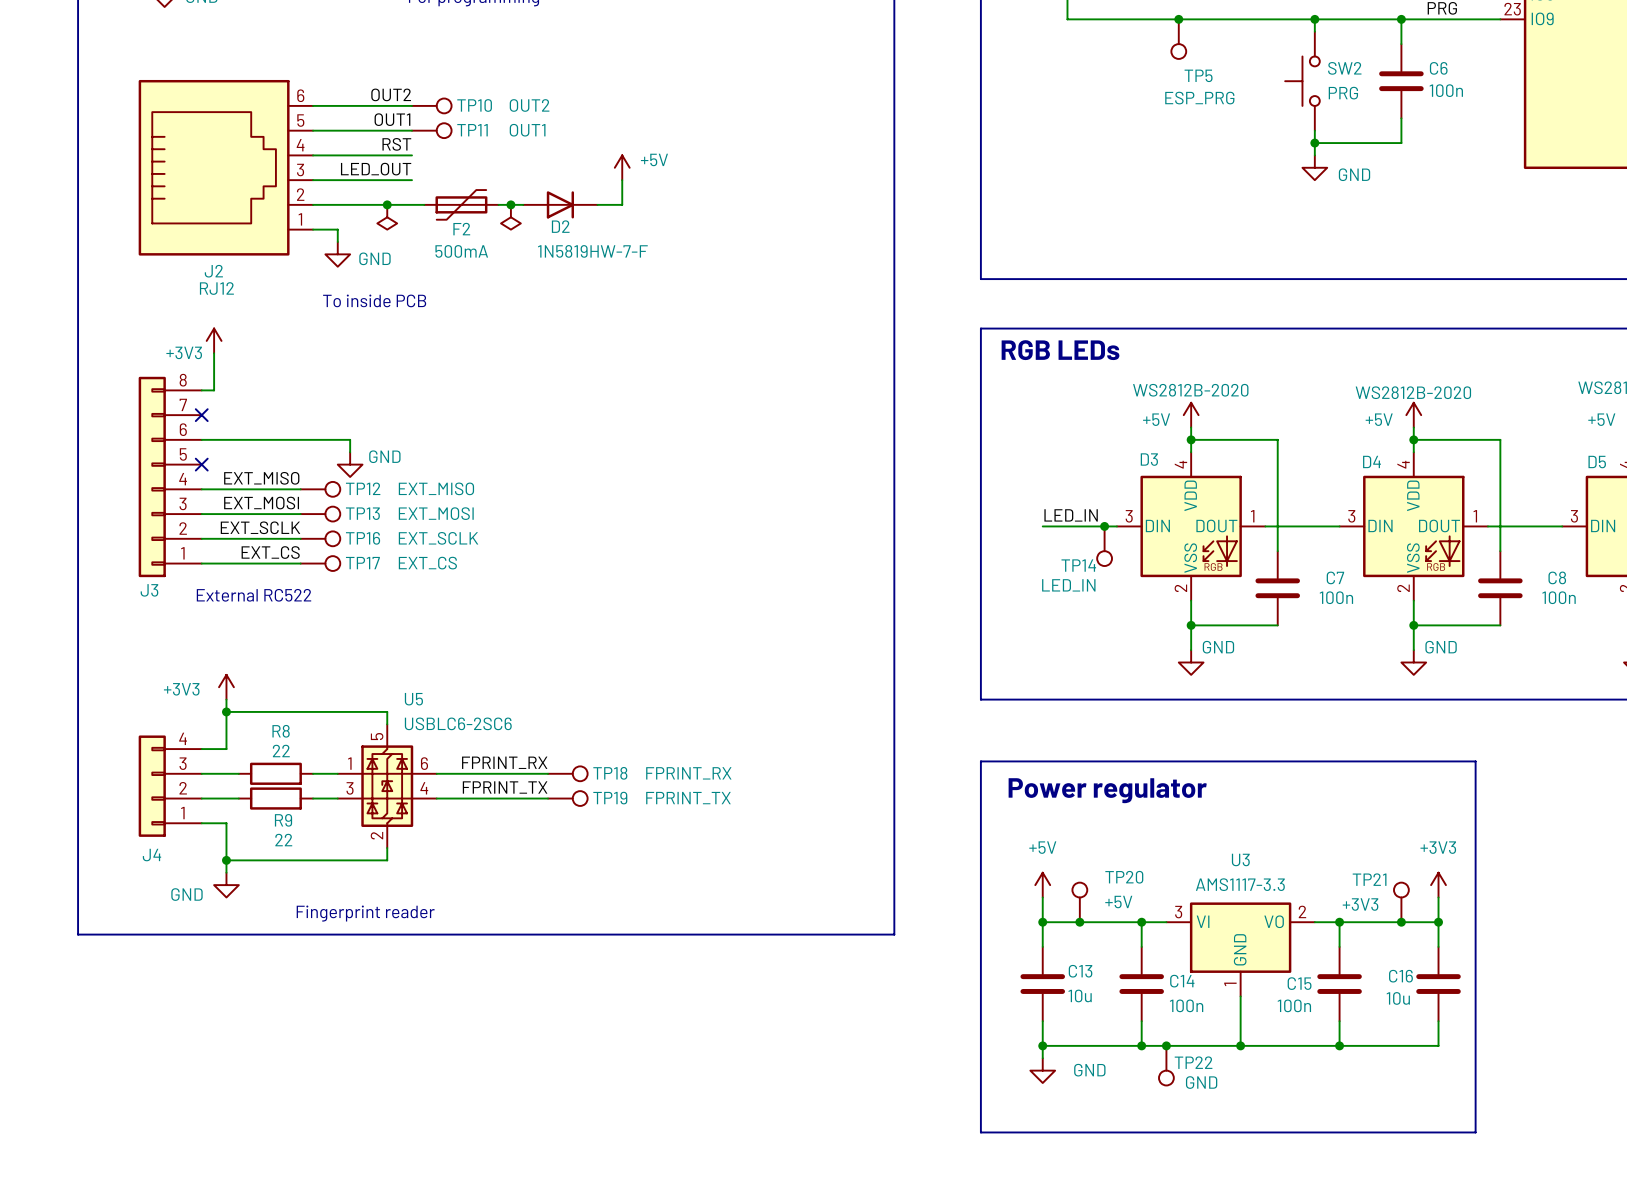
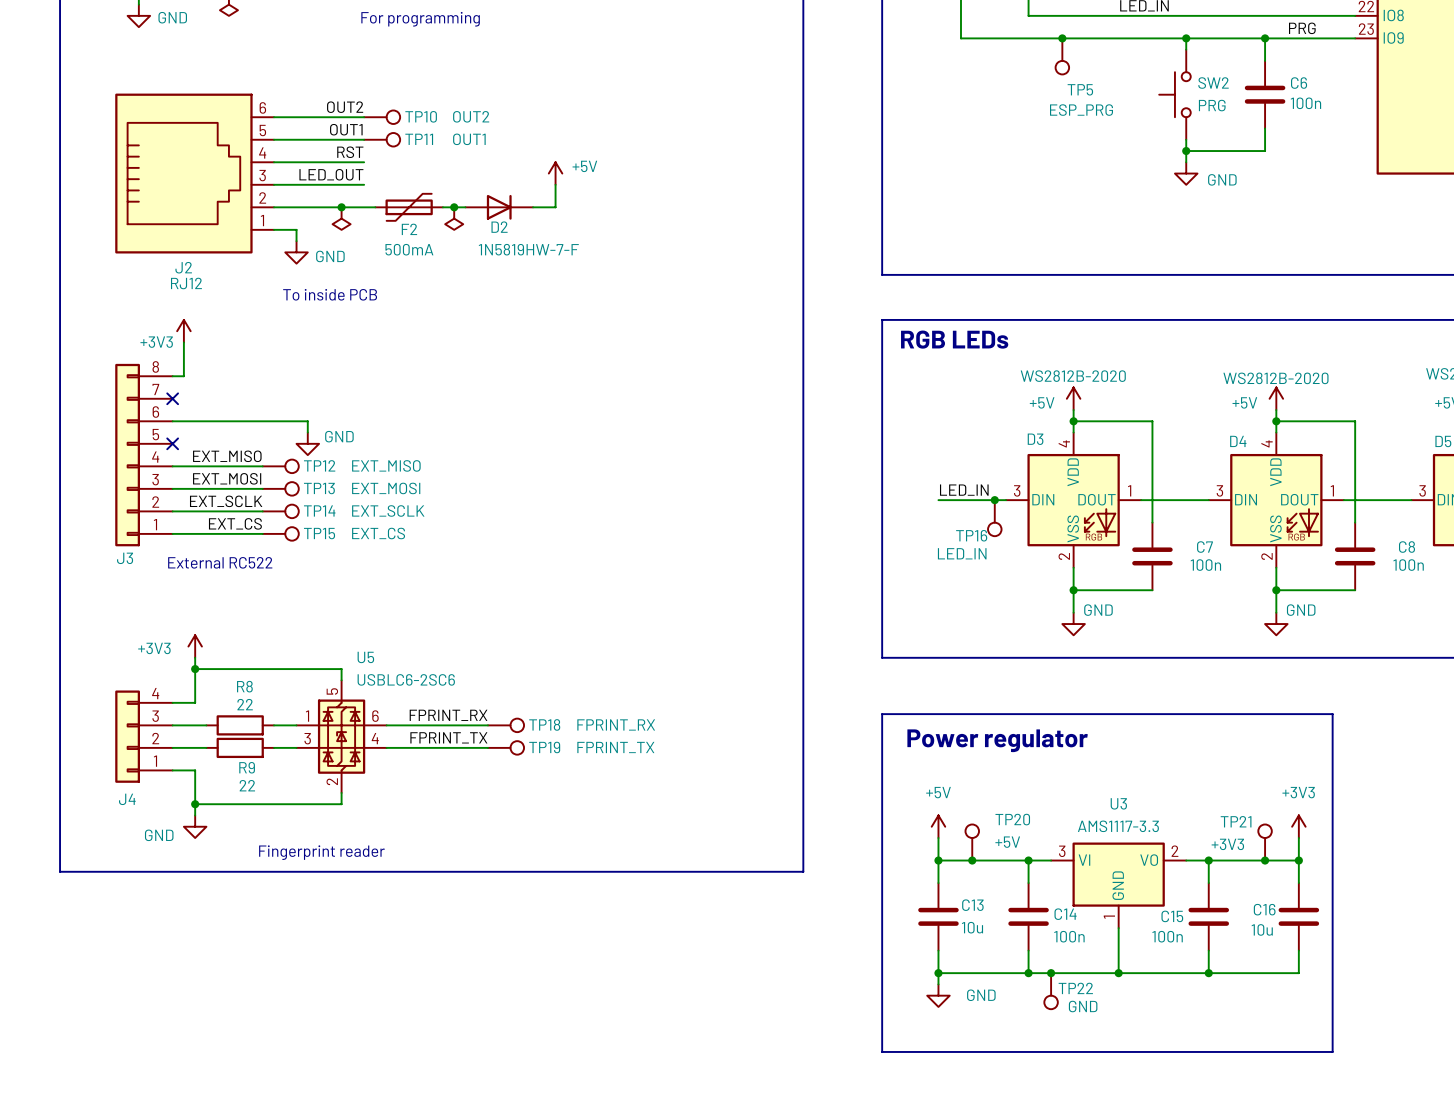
TP16 name: TP16 (363, 538) -> TP14 (319, 510)
TP17 name: TP17 (362, 563) -> TP15 (319, 533)
TP14 name: TP14 (1078, 565) -> TP16 (971, 535)

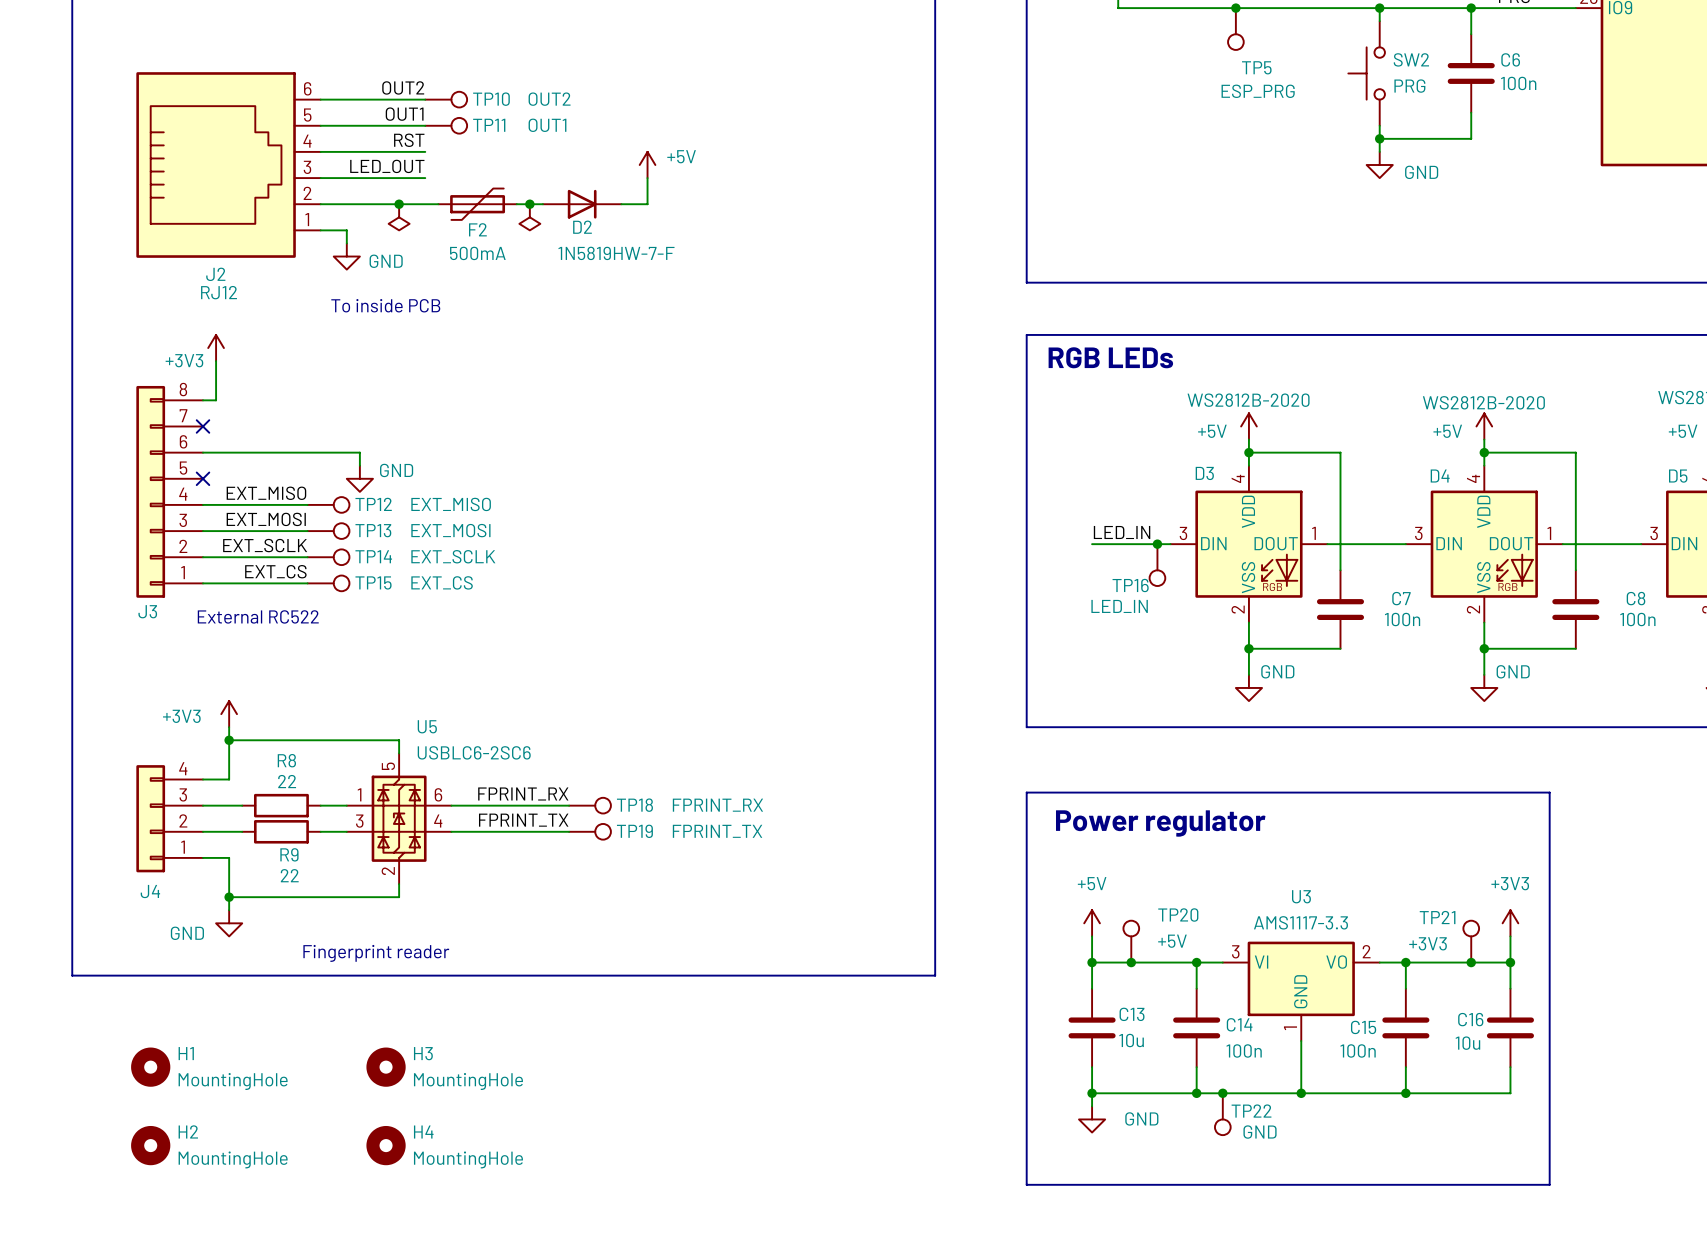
H1: none -> MountingHole (150, 1067)
H3: none -> MountingHole (386, 1067)
H2: none -> MountingHole (150, 1145)
H4: none -> MountingHole (386, 1145)

